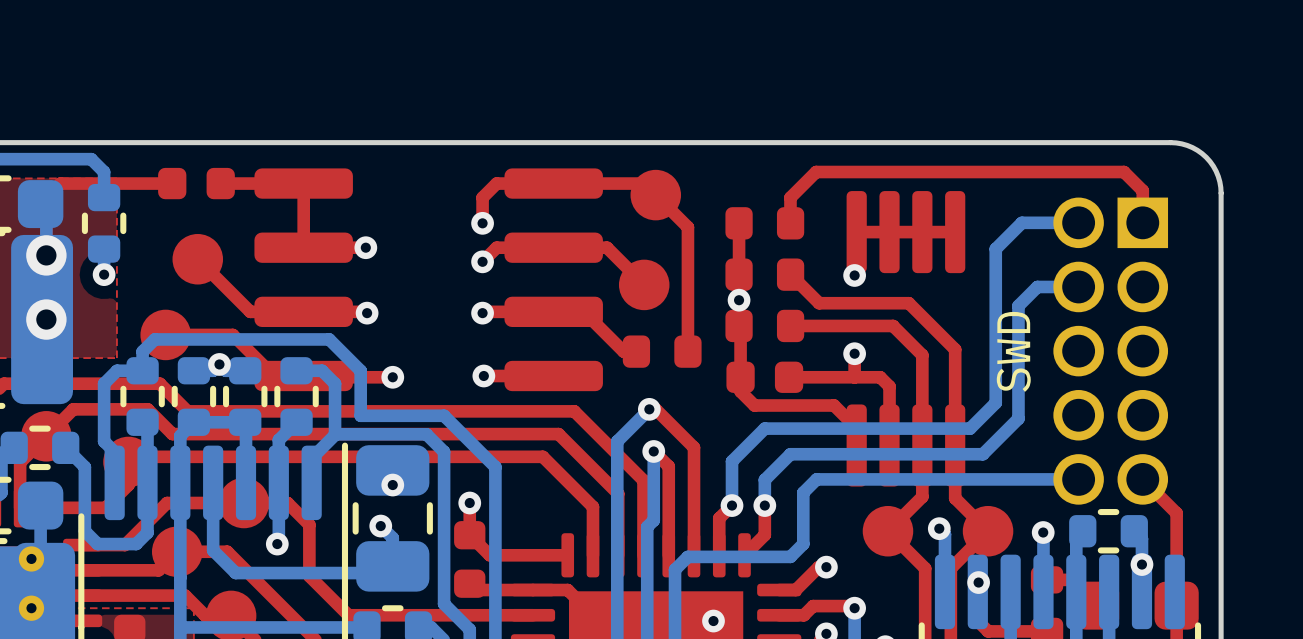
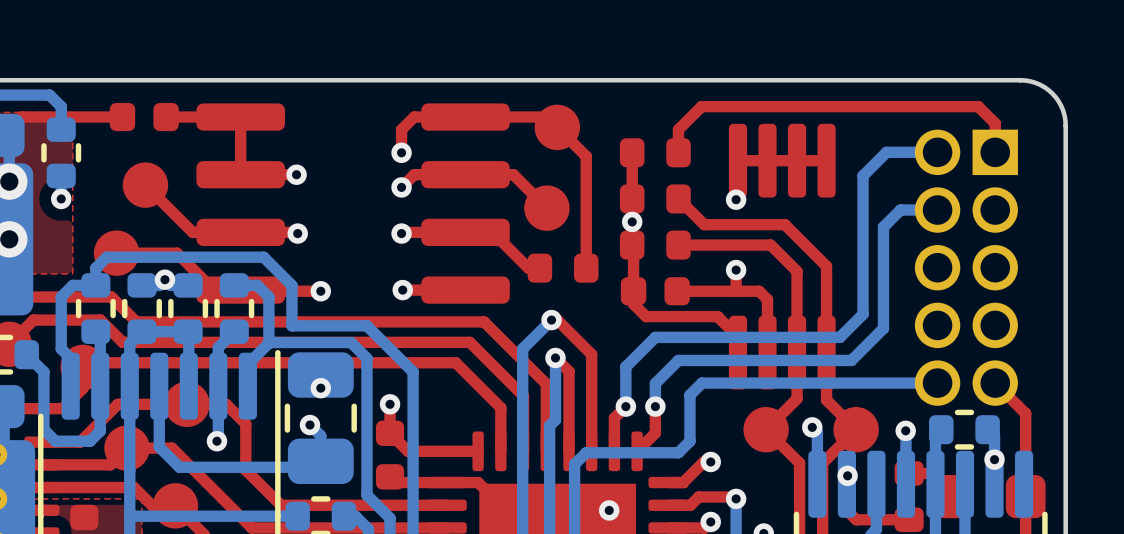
text: SWD (1013, 351) -> none

